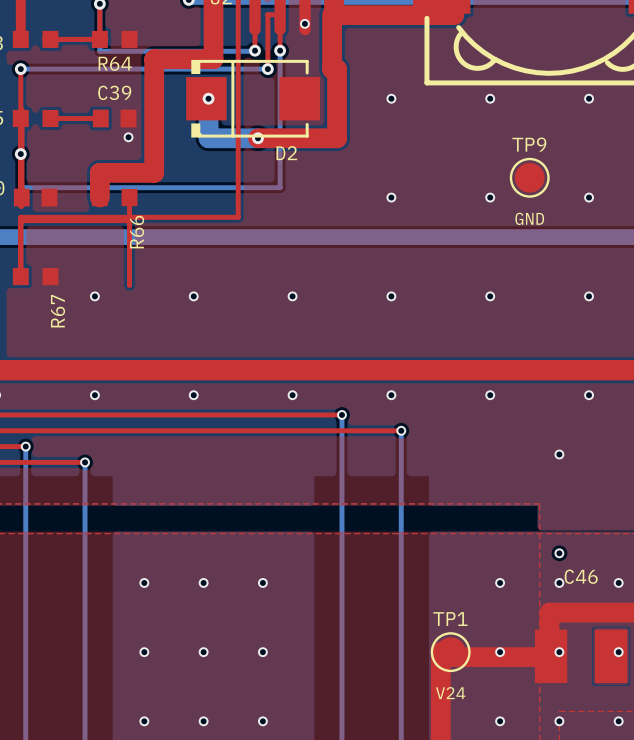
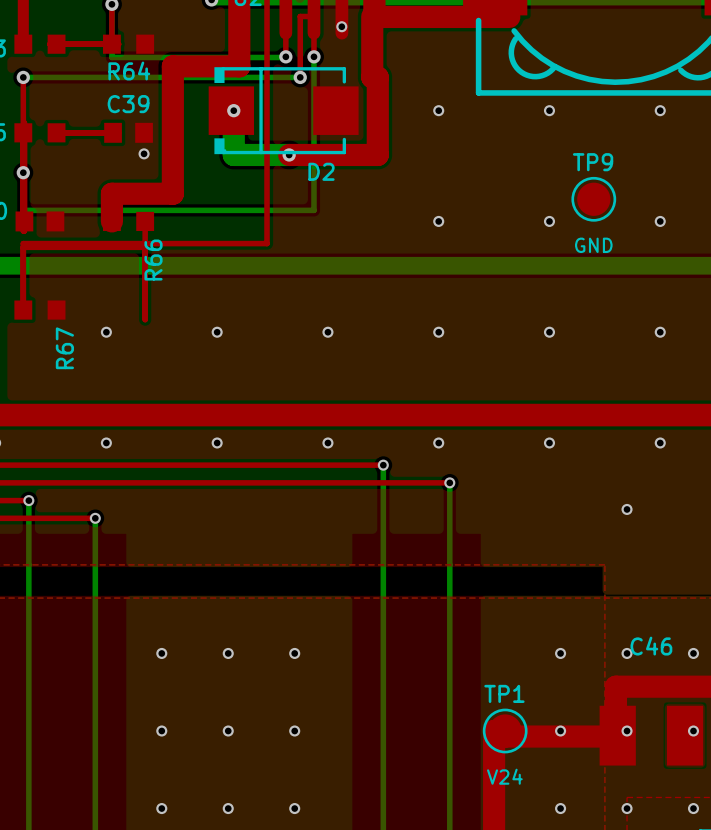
via: (559, 553) -> none

